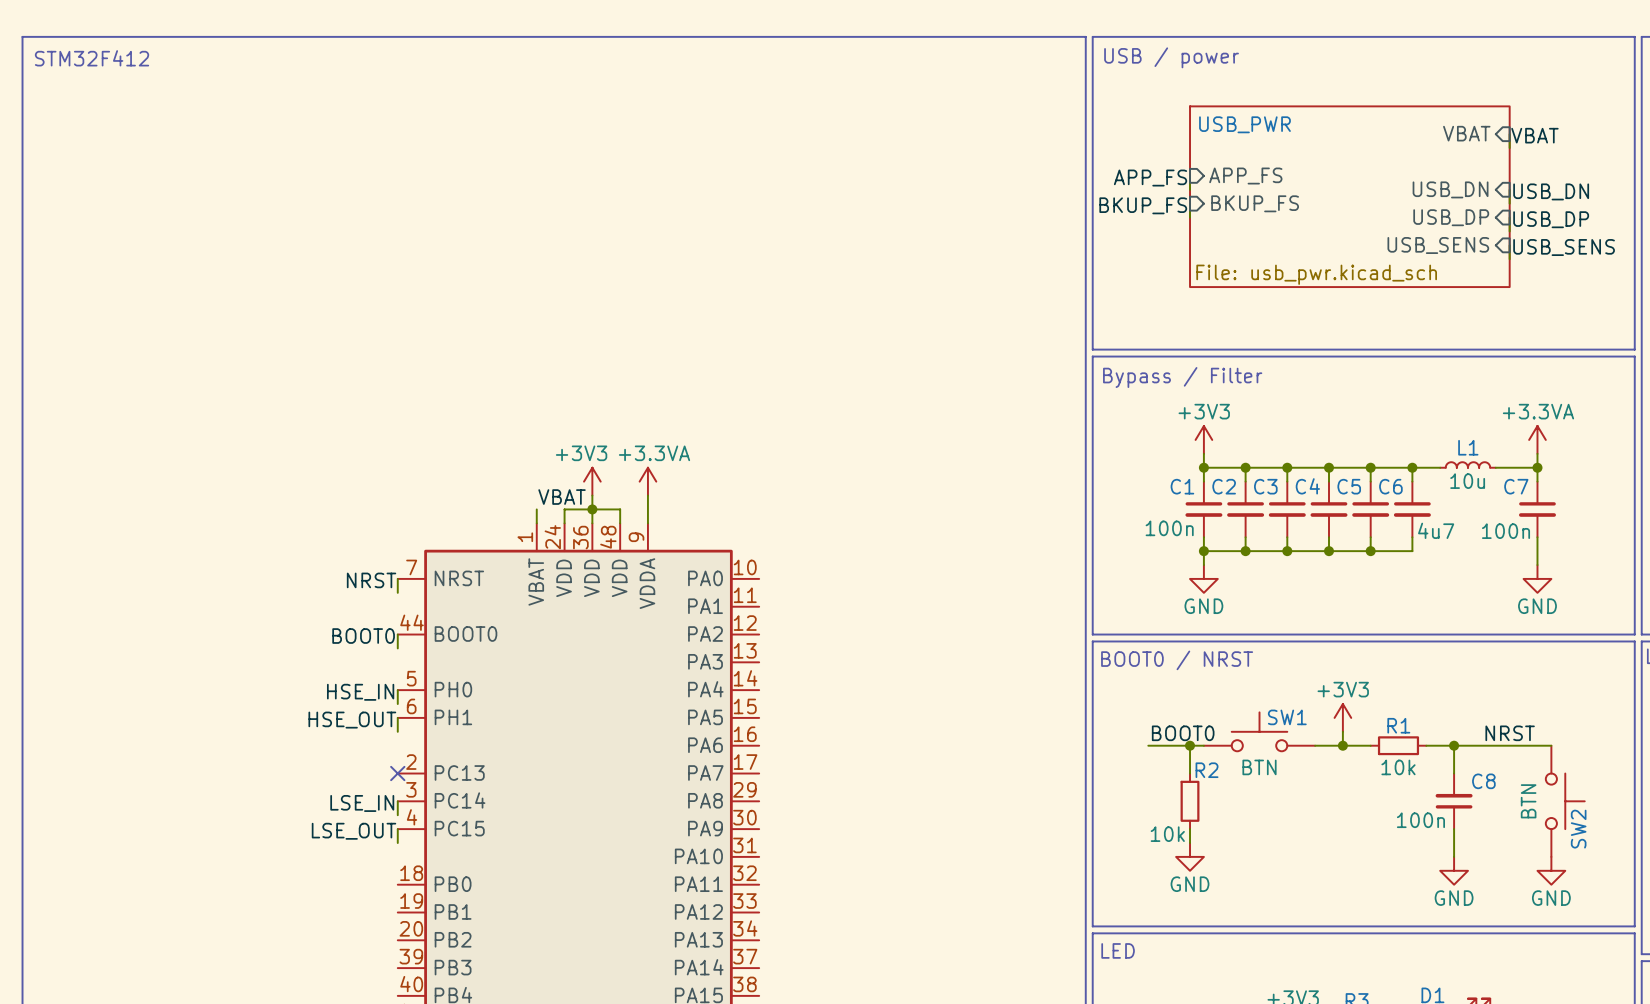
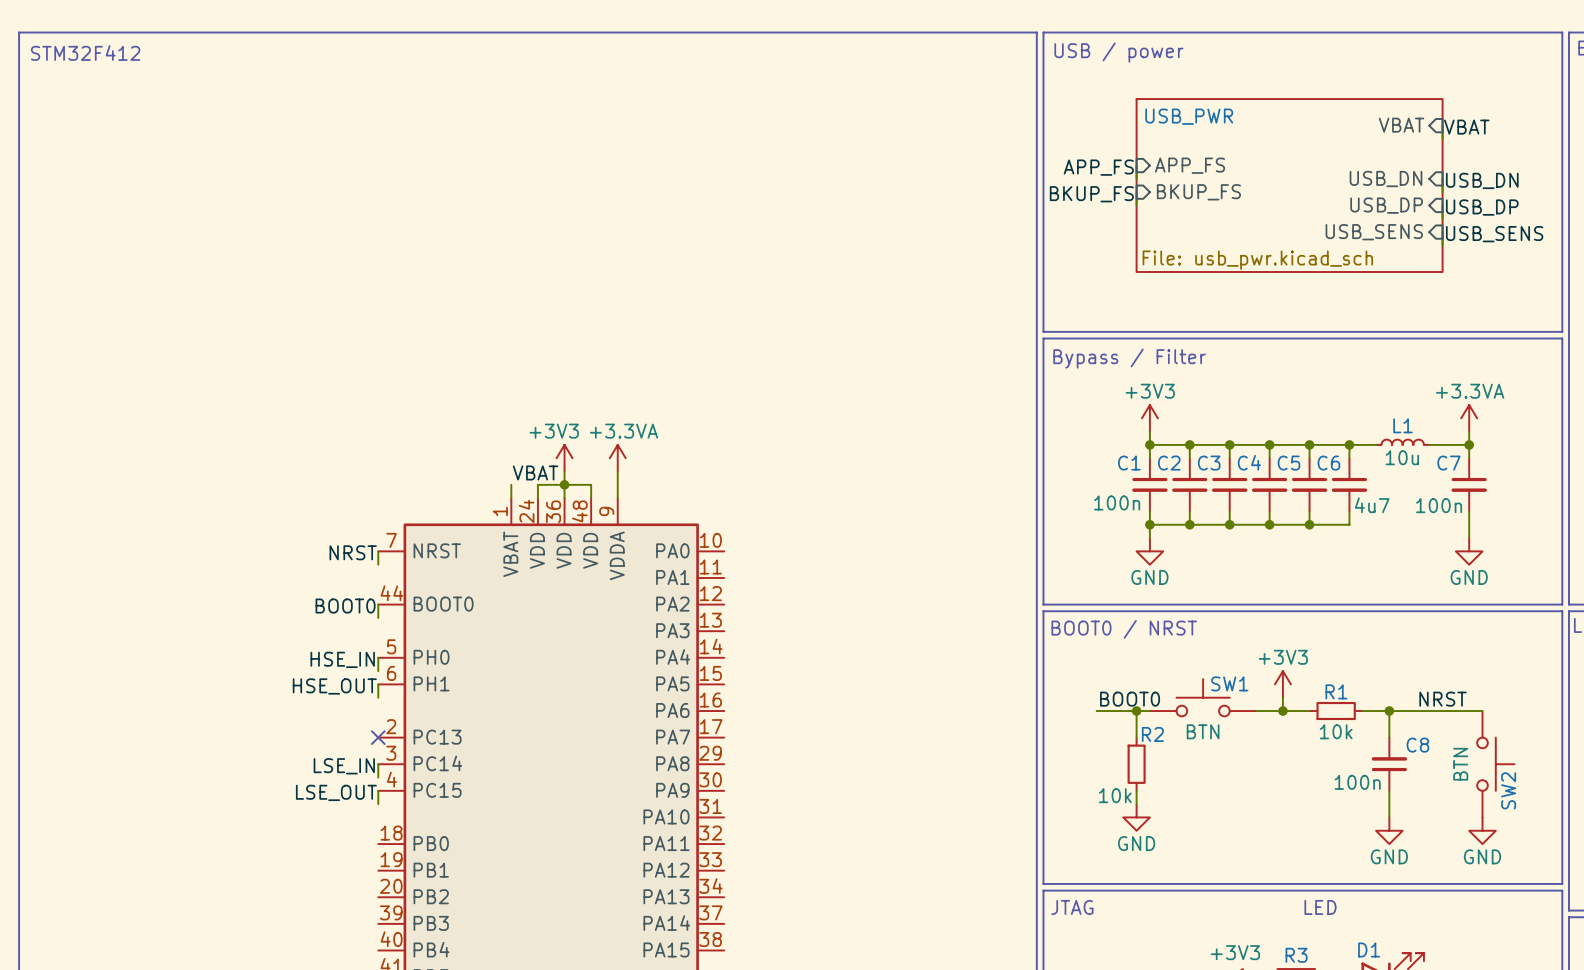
text position: LED (1118, 950) -> LED (1320, 907)
text: none -> JTAG (1072, 907)

